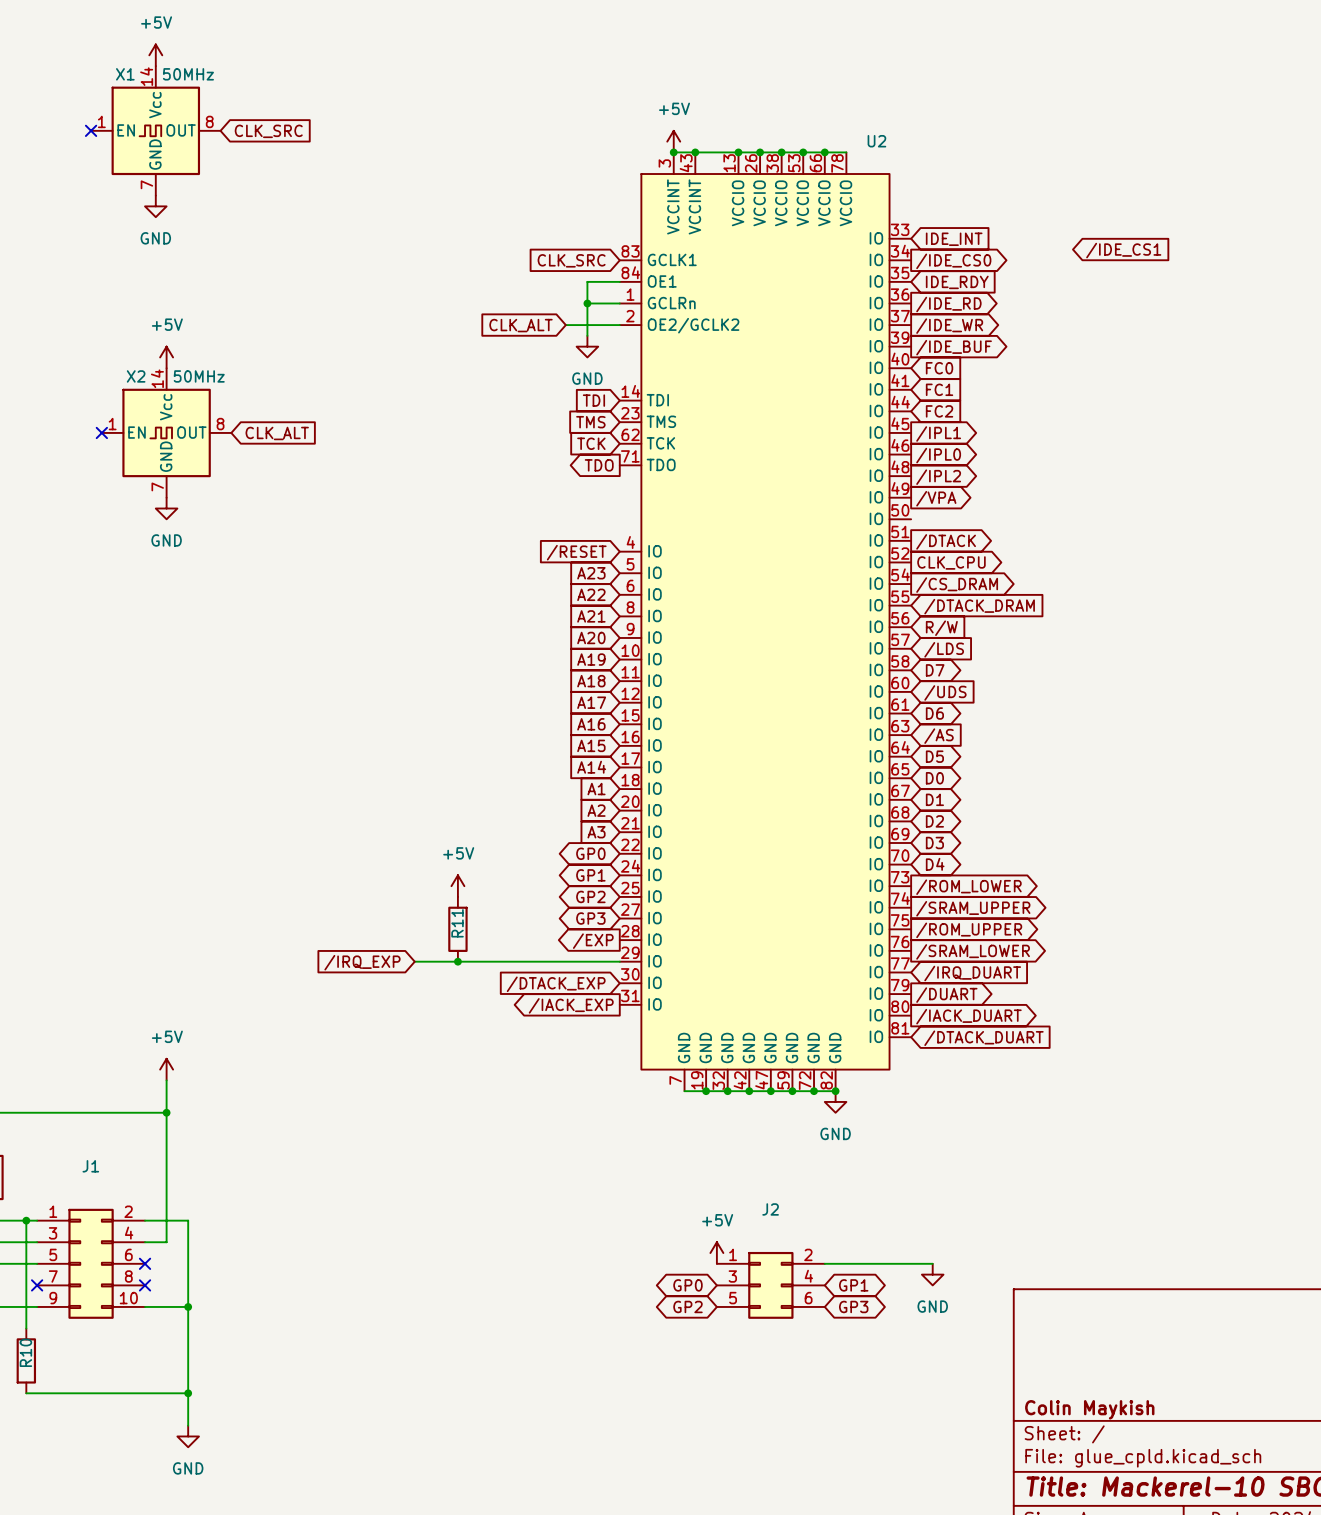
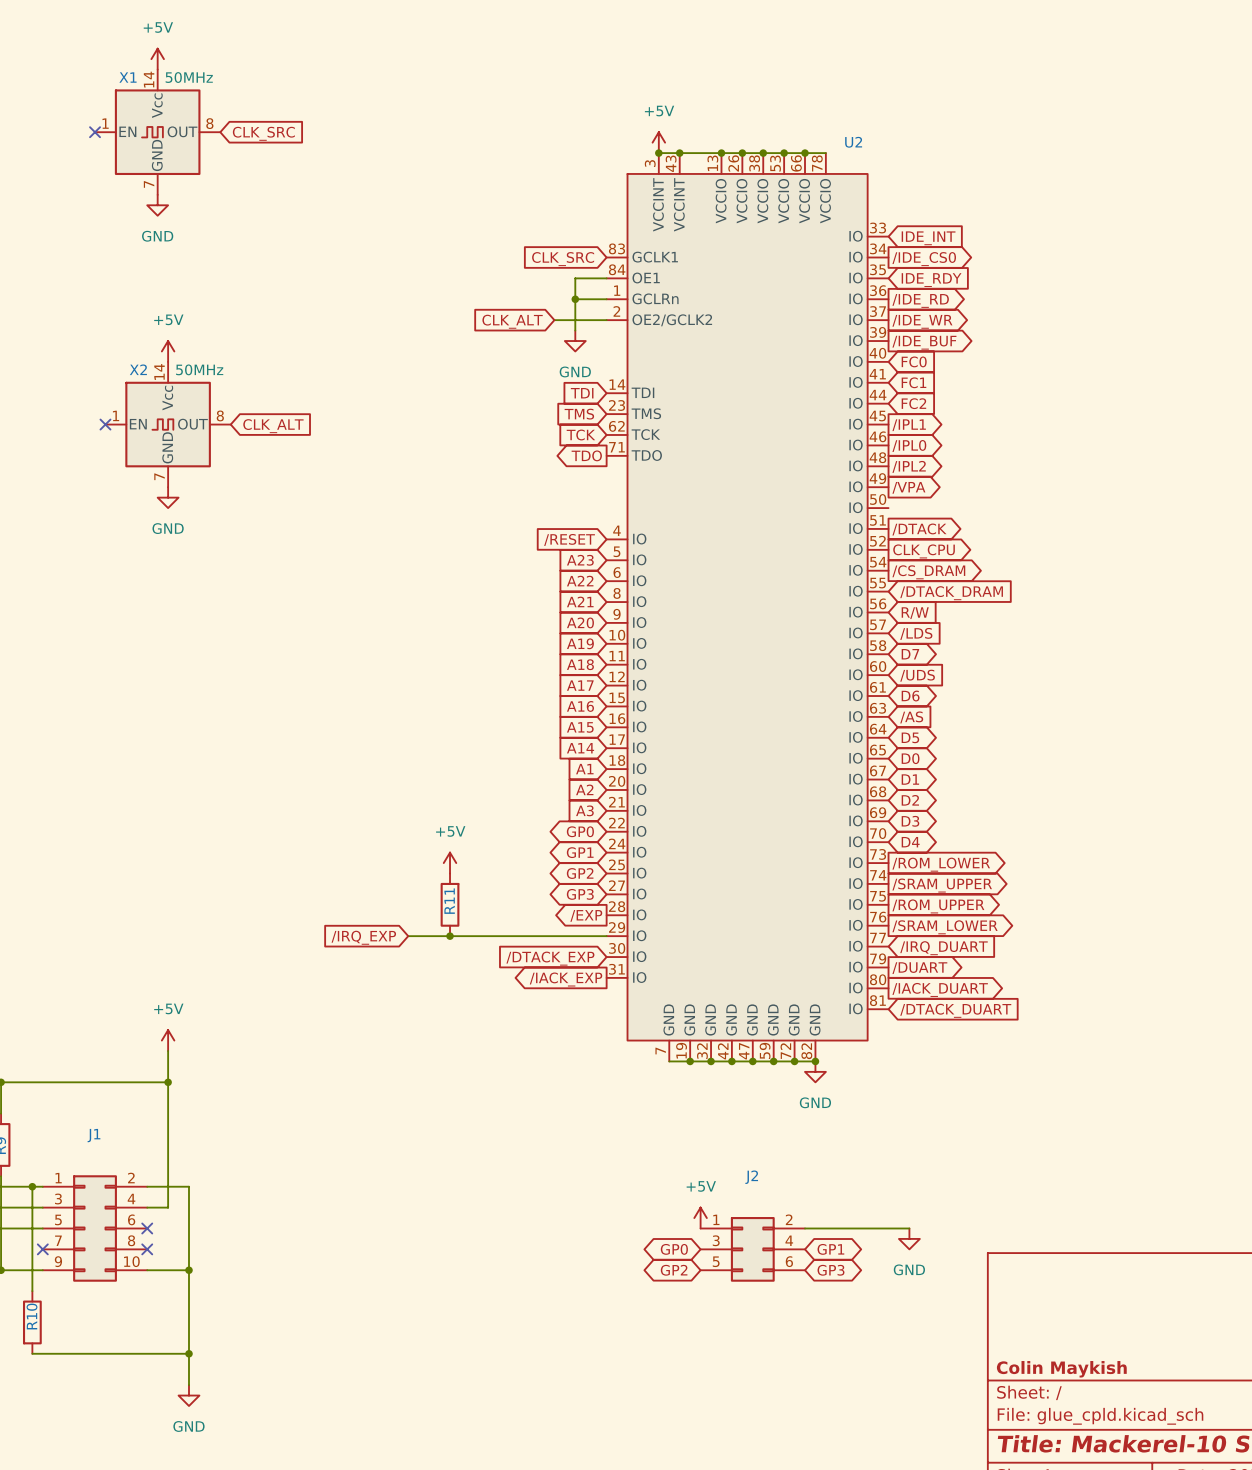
global label: /IDE_CS1 (1123, 250) -> none

